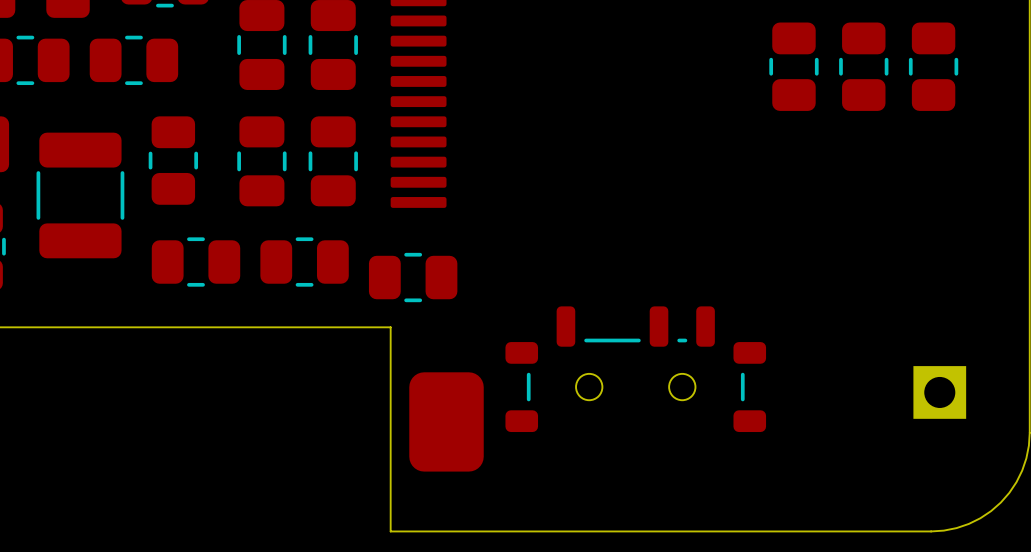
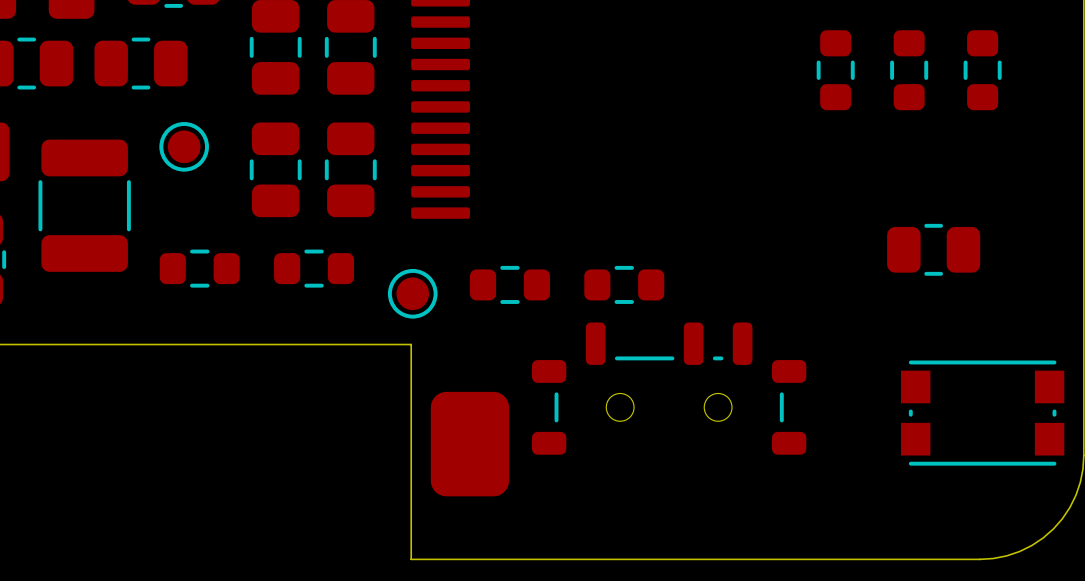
part footprint: [769, 22, 819, 111] -> [816, 30, 855, 111]
part footprint: [839, 22, 889, 111] -> [890, 30, 929, 111]
part footprint: [908, 22, 959, 111] -> [963, 30, 1002, 111]
part footprint: [148, 116, 199, 205] -> [159, 122, 209, 172]
part footprint: [151, 237, 241, 287] -> [159, 249, 240, 288]
part footprint: [260, 237, 349, 287] -> [274, 249, 355, 288]
part: none -> (933, 249)
part footprint: [368, 252, 458, 303] -> [387, 268, 438, 319]
part: none -> (509, 284)
part: none -> (624, 284)
part footprint: [913, 366, 967, 419] -> [900, 360, 1065, 466]

